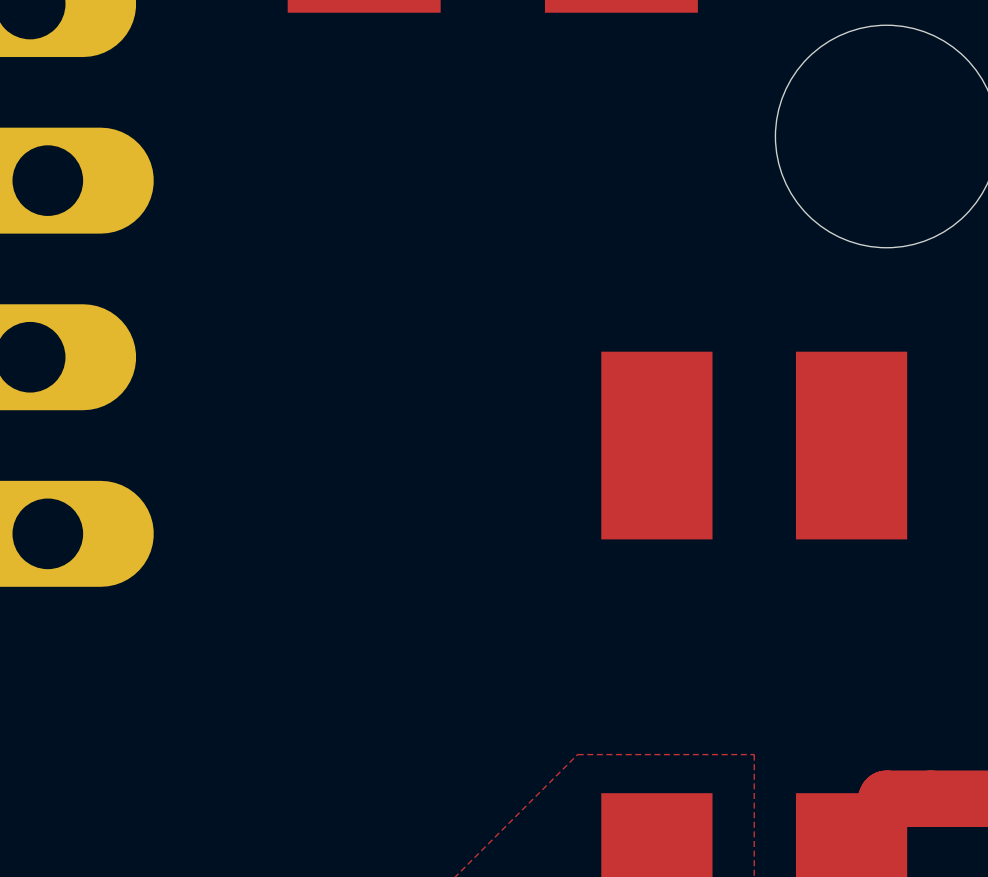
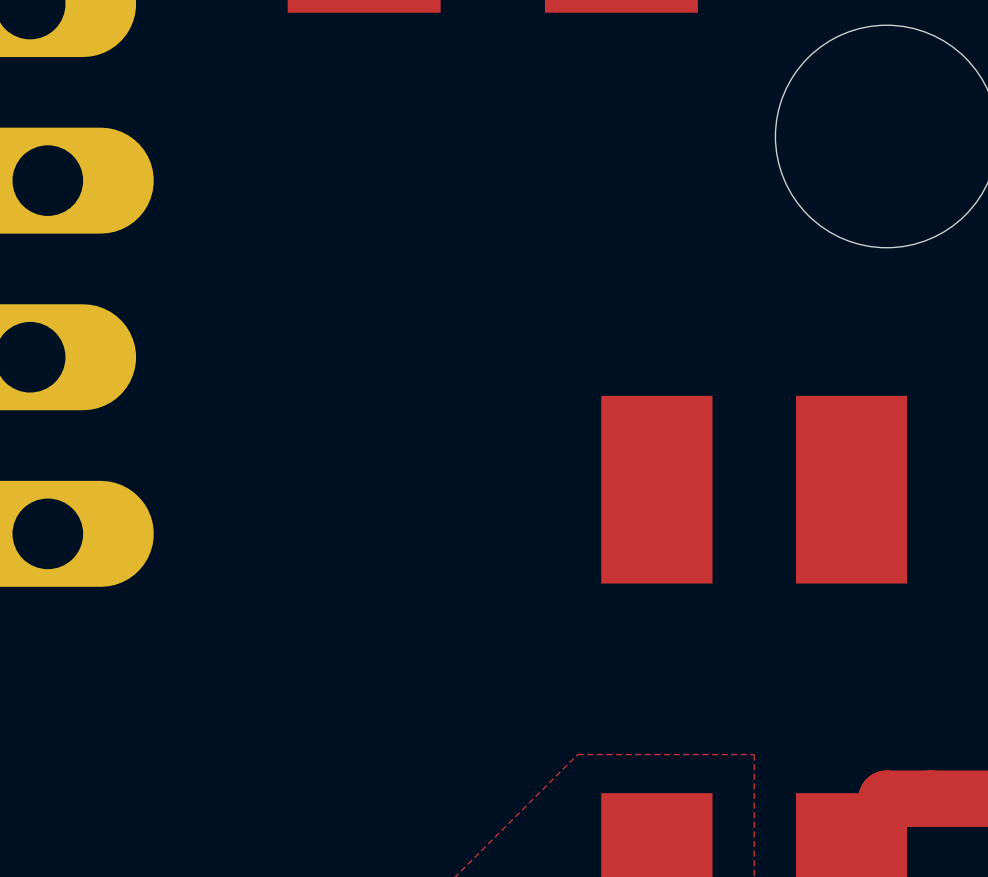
part position: (754, 445) -> (754, 489)

